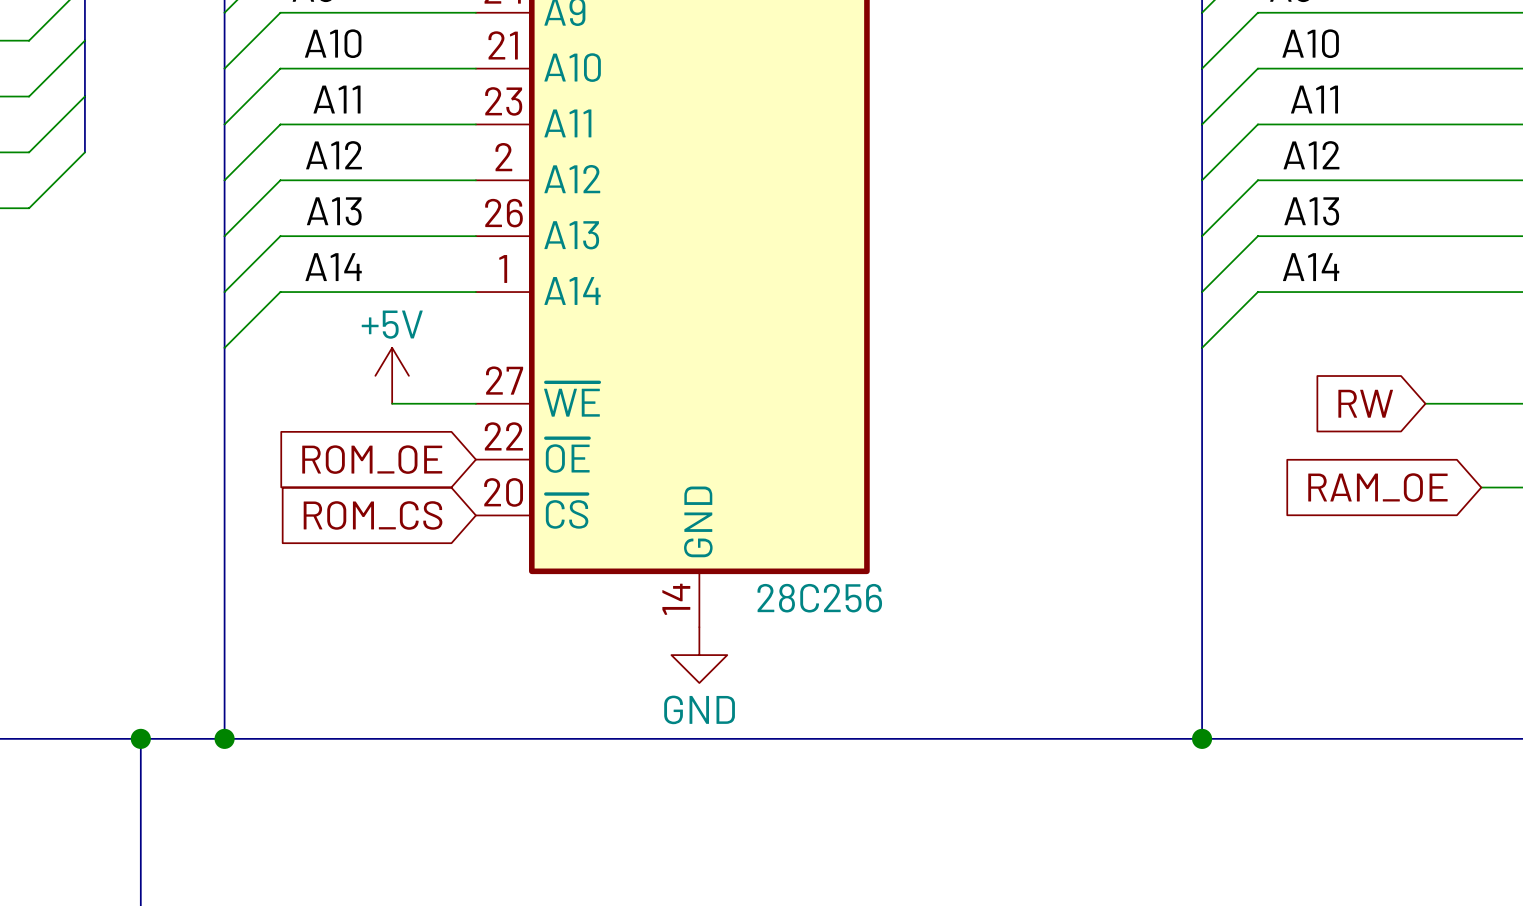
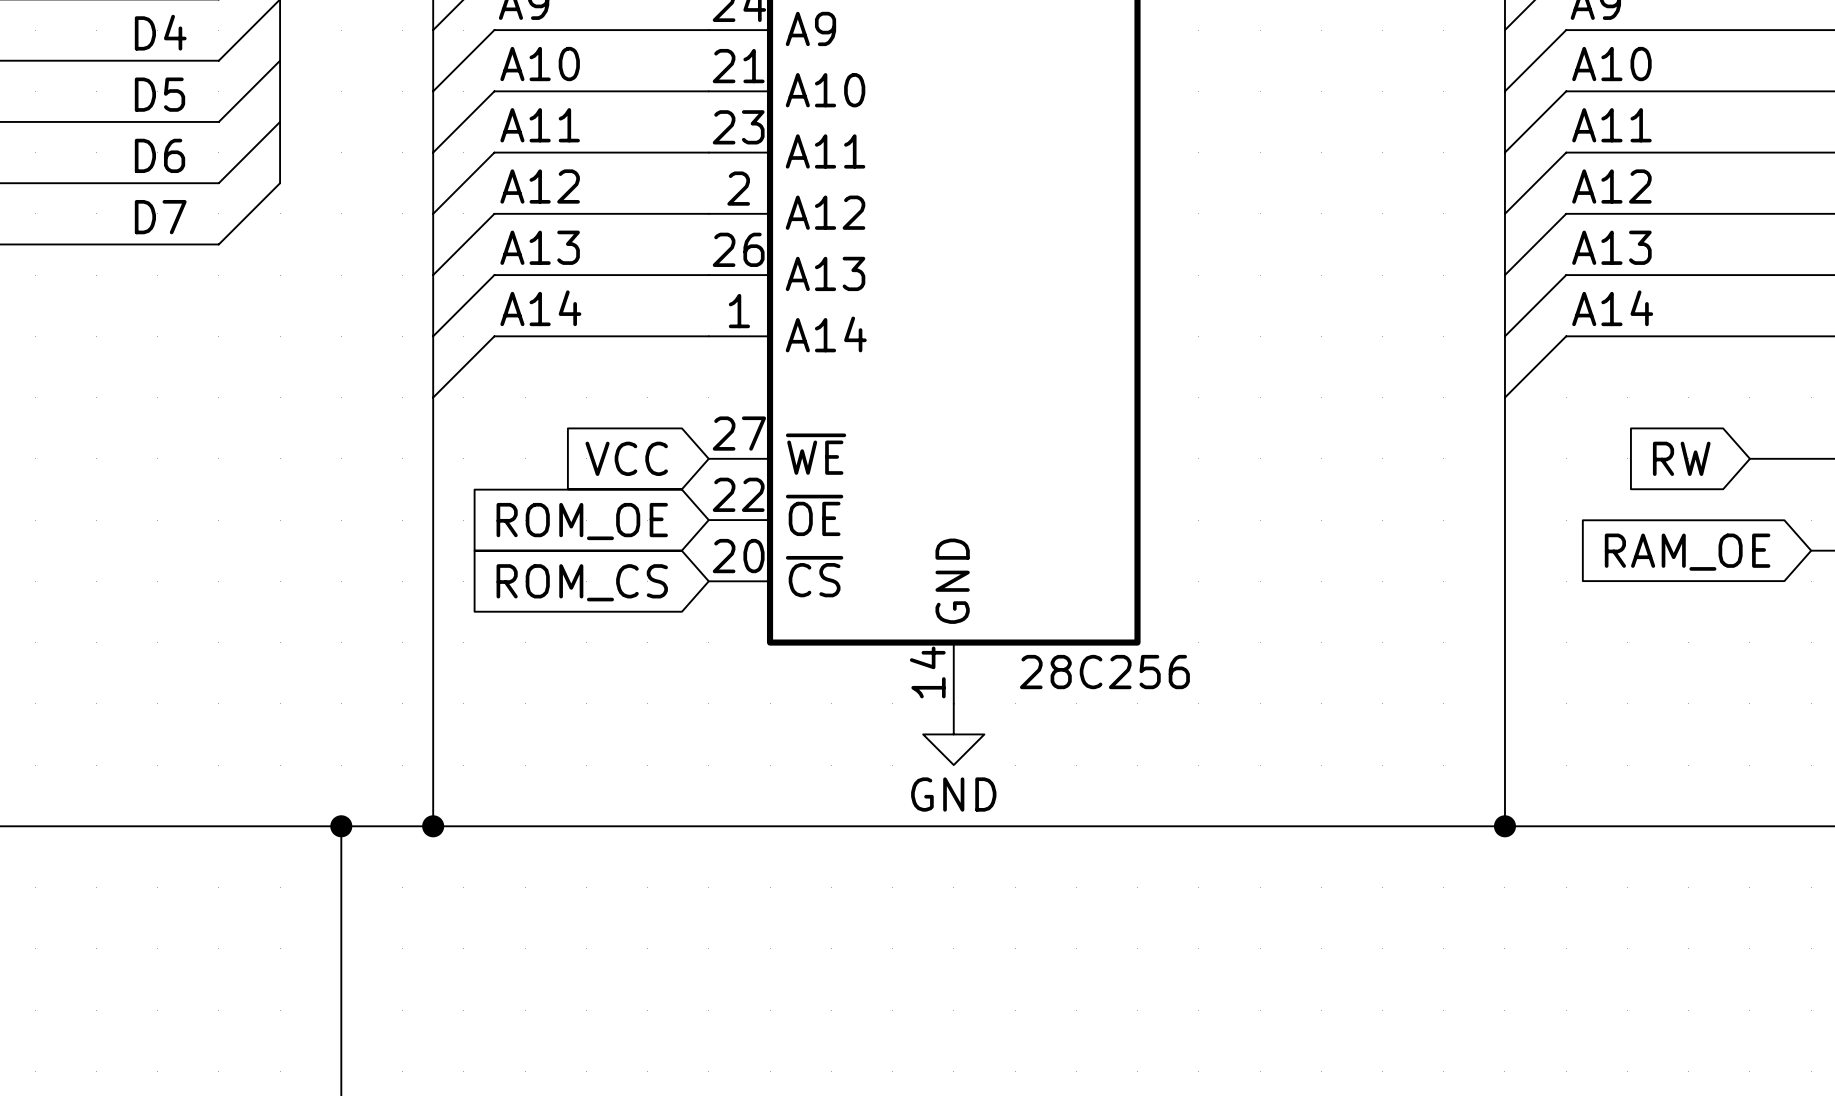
power symbol: +5V (392, 375) -> none
wire: (392, 403) (475, 403) -> none
global label: none -> VCC (626, 458)

